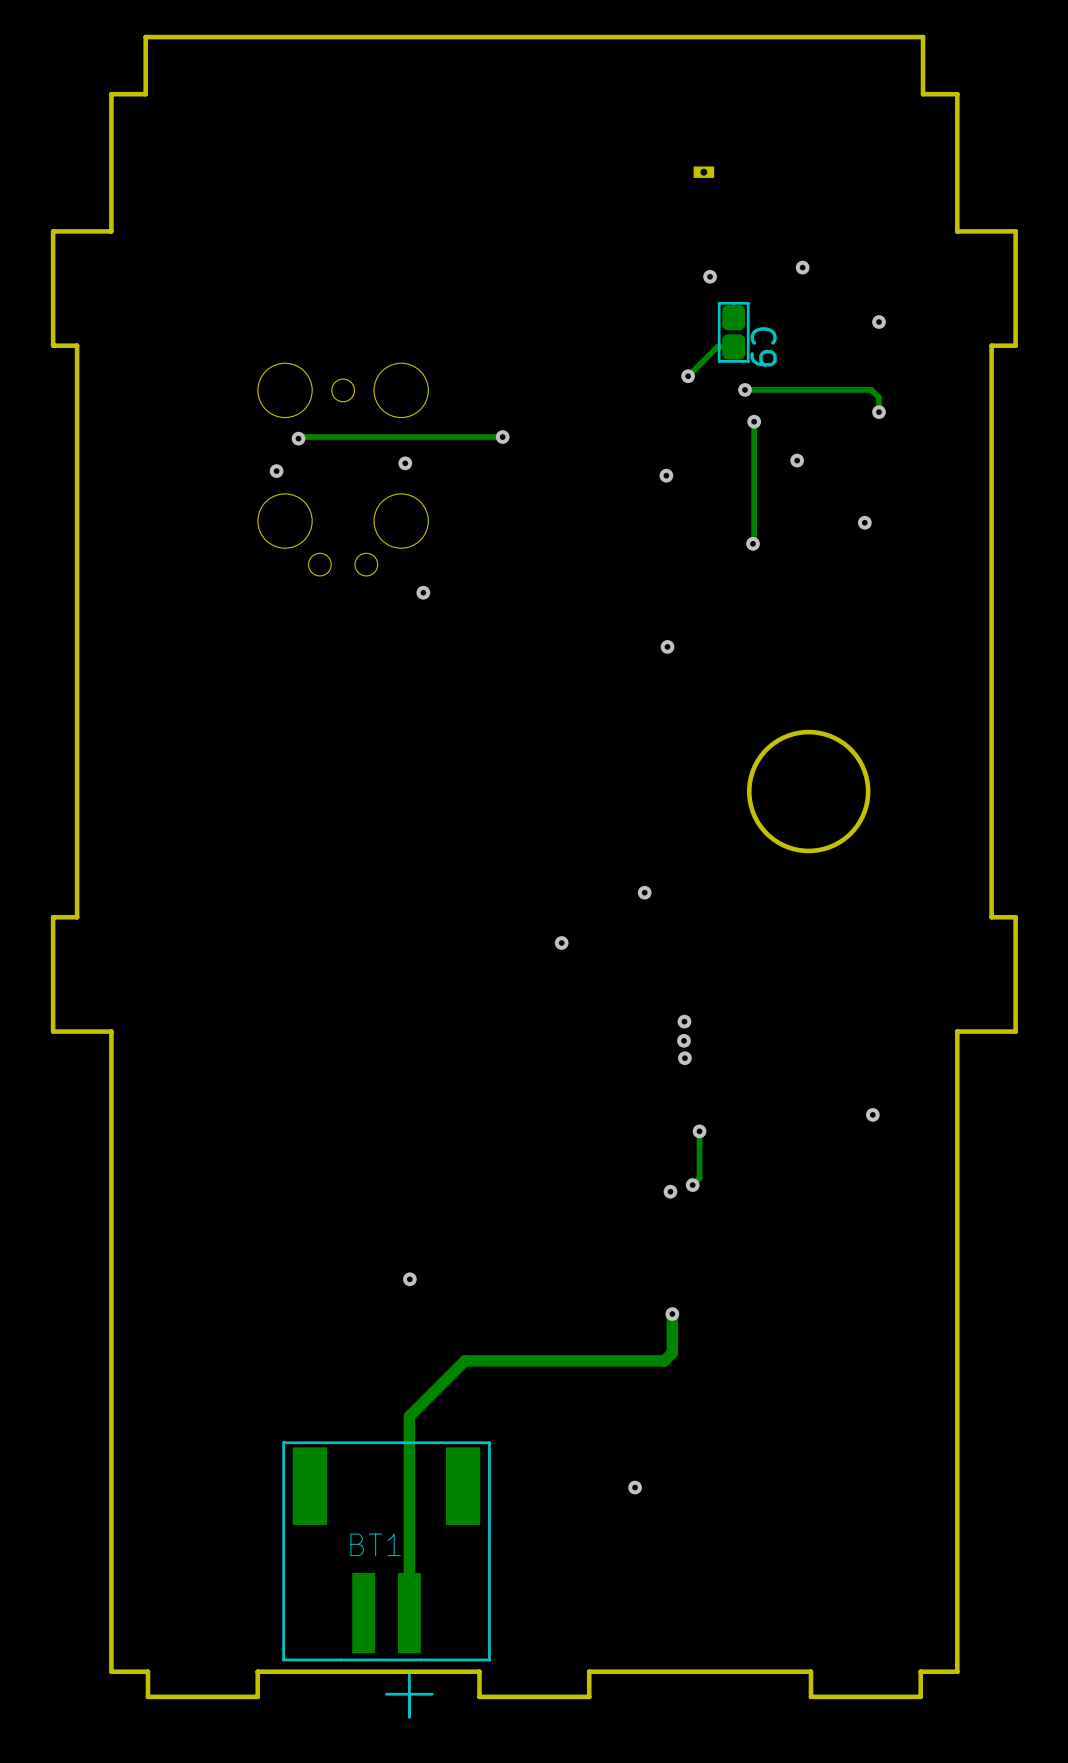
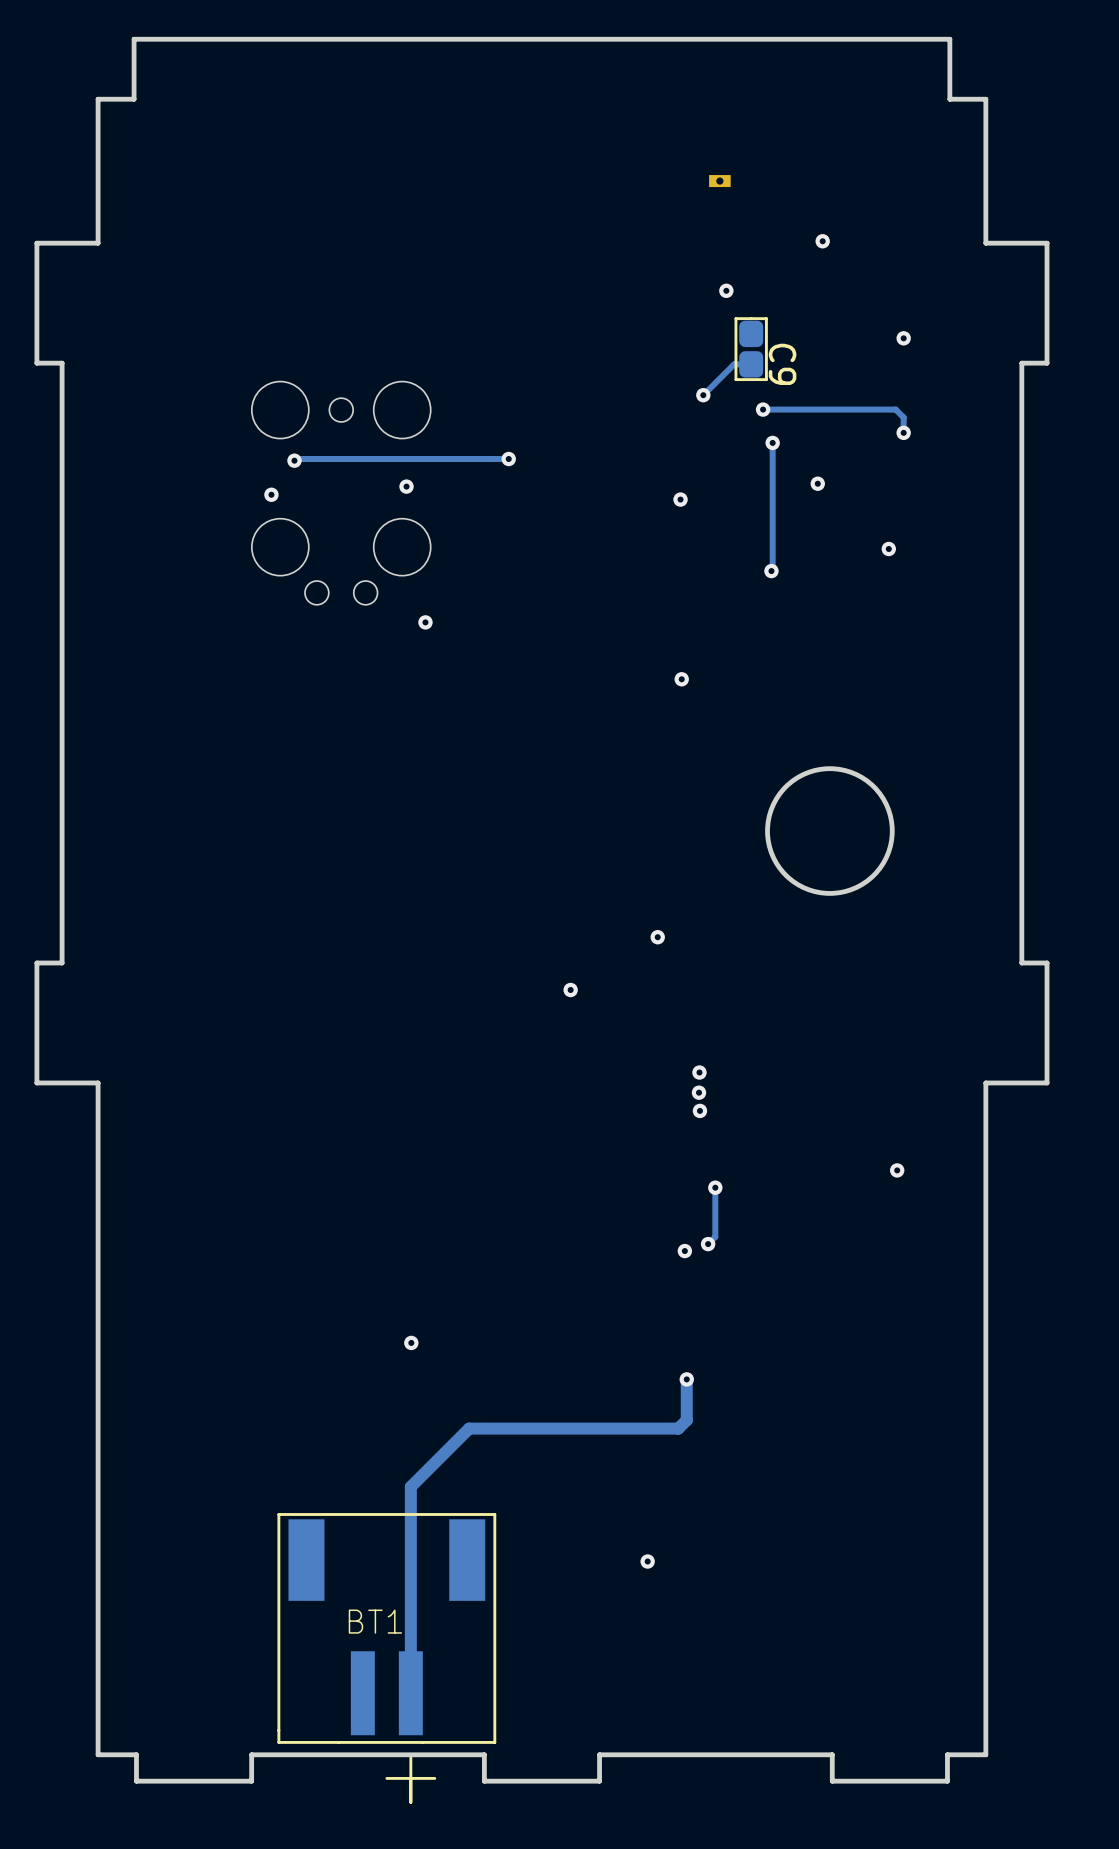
via position: (802, 267) -> (822, 241)

